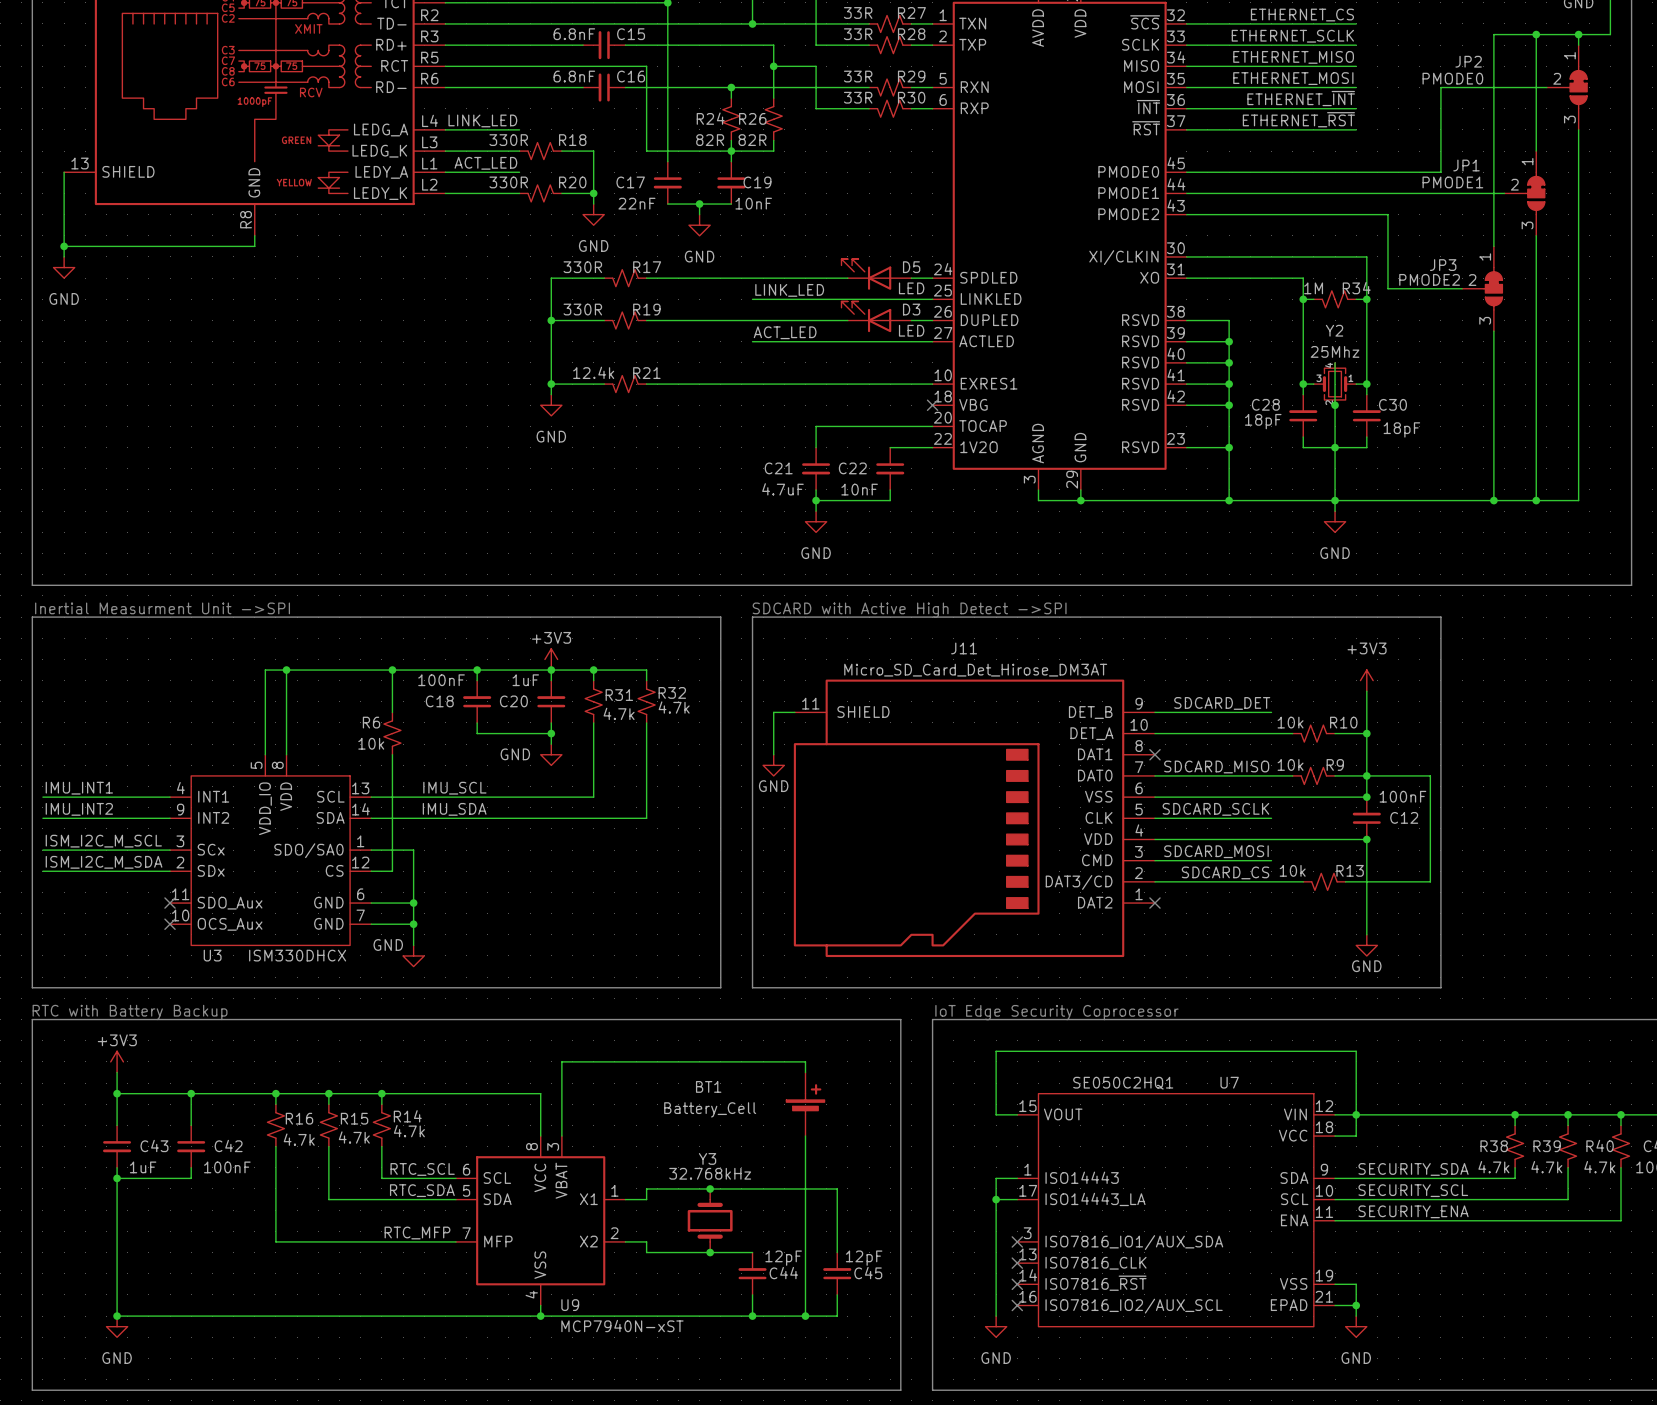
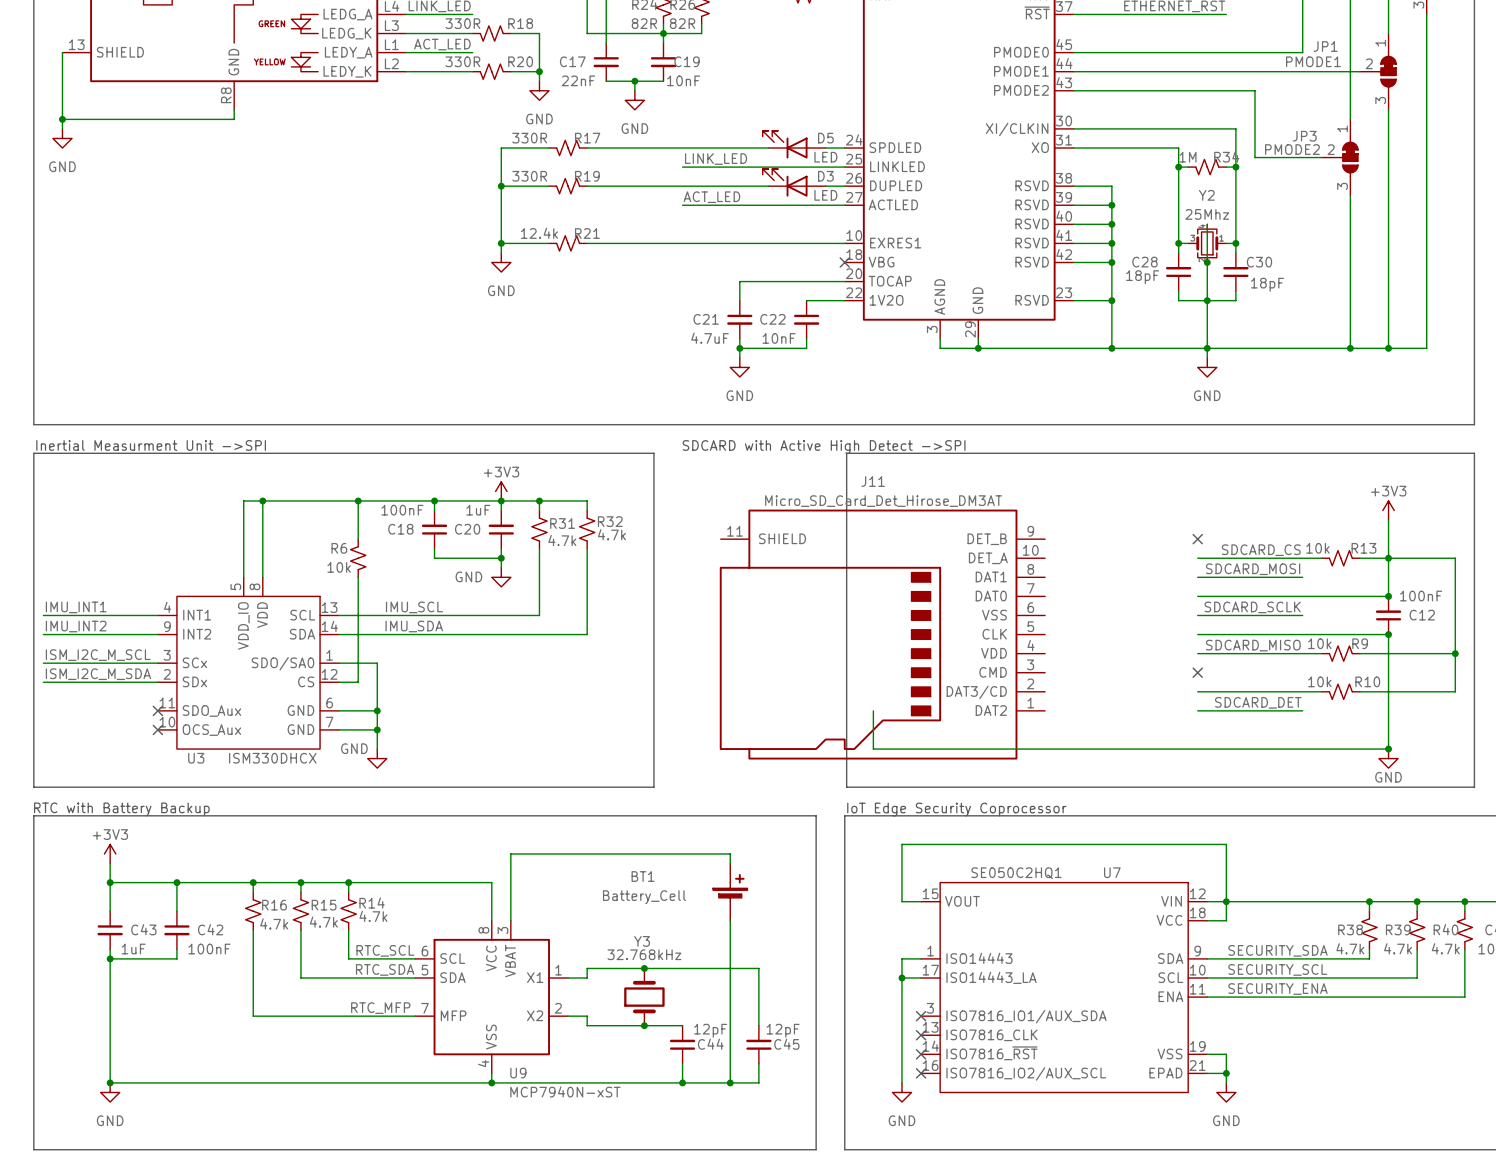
line: (934, 617) (752, 617) (752, 987) (934, 987) -> (846, 453) (846, 787)
line: (1440, 617) (1440, 987) -> (1302, 453) (1474, 453) (1474, 787) (1302, 787)
power symbol text position: +3V3 (1367, 648) -> +3V3 (1388, 491)
power symbol position: +3V3 (1366, 680) -> +3V3 (1388, 510)
wire: (1366, 691) (1366, 797) -> (1302, 615) (1235, 615)
wire: none -> (1388, 520) (1388, 596) (1293, 596)
label: SDCARD_DET (1222, 703) -> none
wire: (794, 712) (773, 712) (773, 754) -> none
wire: (1154, 712) (1271, 712) -> (1197, 577) (1302, 577)
no-connect mark: none -> (1197, 539)
label: none -> SDCARD_CS (1261, 550)
wire: (1154, 733) (1292, 733) -> none
R10 position: (1313, 733) -> (1340, 691)
wire: none -> (1235, 558) (1321, 558)
junction: (1366, 733) -> none
wire: none -> (1359, 558) (1455, 558) (1455, 691) (1359, 691)
junction: none -> (1388, 558)
no-connect mark: (1154, 754) -> none
power symbol: GND (773, 765) -> none
label position: SDCARD_MISO (1216, 767) -> SDCARD_MISO (1253, 645)
wire: (1154, 775) (1292, 775) -> none
R9 position: (1313, 775) -> (1340, 653)
junction: (1366, 775) -> none
wire: (1430, 775) (1430, 881) -> (1321, 691) (1293, 691)
junction: none -> (1388, 596)
wire: (1154, 797) (1324, 797) -> none
junction: (1366, 797) -> none
label position: SDCARD_SCLK (1215, 809) -> SDCARD_SCLK (1252, 607)
wire: (1154, 818) (1271, 818) -> none
wire: none -> (1197, 634) (1388, 634) (1388, 749) (873, 749) (873, 710)
C12 position: (1366, 818) -> (1388, 615)
junction: none -> (1388, 634)
wire: (1154, 839) (1324, 839) -> none
wire: (1366, 839) (1366, 934) -> (1235, 653) (1321, 653)
junction: (1366, 839) -> none
wire: none -> (1359, 653) (1455, 653)
junction: none -> (1455, 653)
label position: SDCARD_MOSI (1216, 851) -> SDCARD_MOSI (1253, 569)
wire: (1154, 860) (1271, 860) -> (1197, 710) (1302, 710)
no-connect mark: none -> (1197, 672)
R13 value position: 10k (1292, 870) -> 10k (1317, 548)
label: SDCARD_CS (1225, 872) -> none
wire: (1154, 881) (1303, 881) -> none
R13 position: (1324, 881) -> (1340, 558)
label: none -> SDCARD_DET (1258, 702)
no-connect mark: (1154, 903) -> none
power symbol position: GND (1366, 945) -> GND (1388, 758)
junction: none -> (1388, 749)

